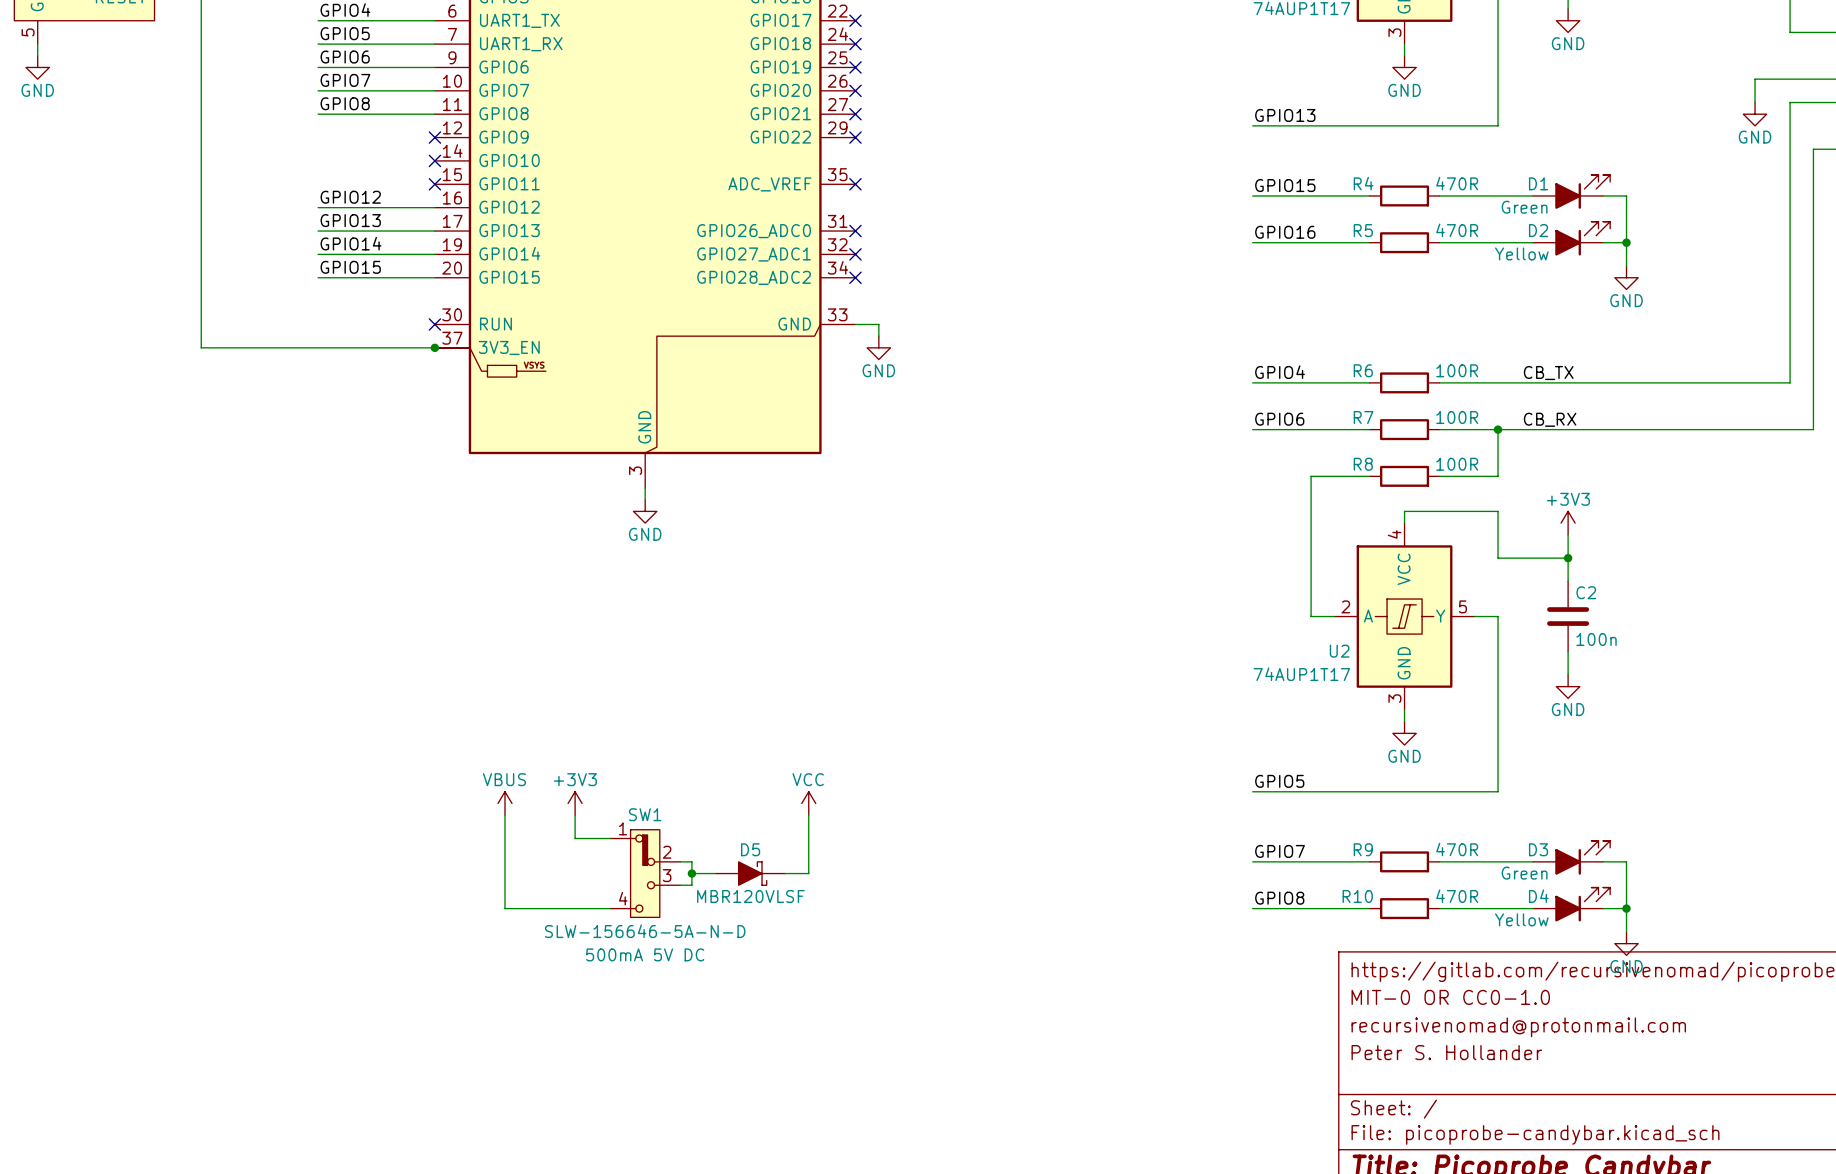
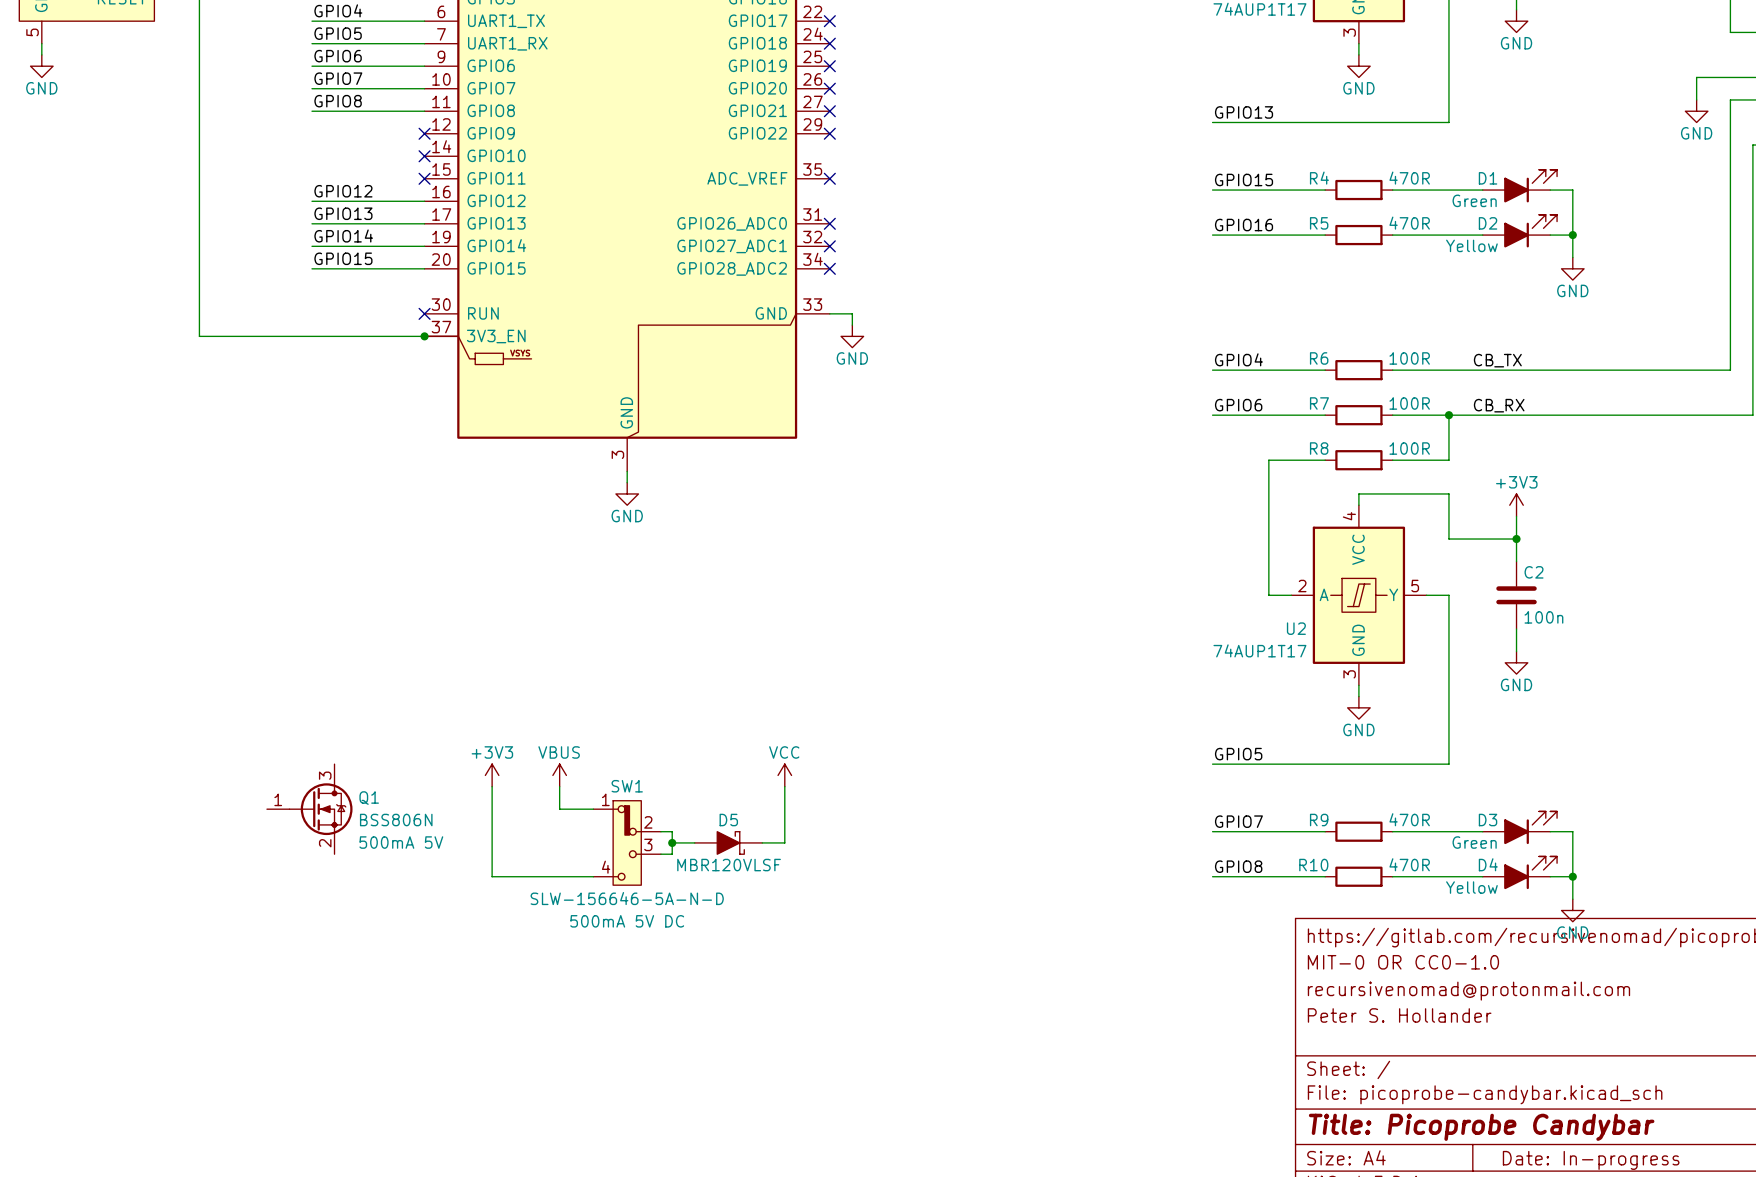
power symbol: VBUS (505, 803) -> +3V3 (492, 775)
power symbol: +3V3 (575, 803) -> VBUS (559, 775)
Q1: none -> BSS806N (309, 809)

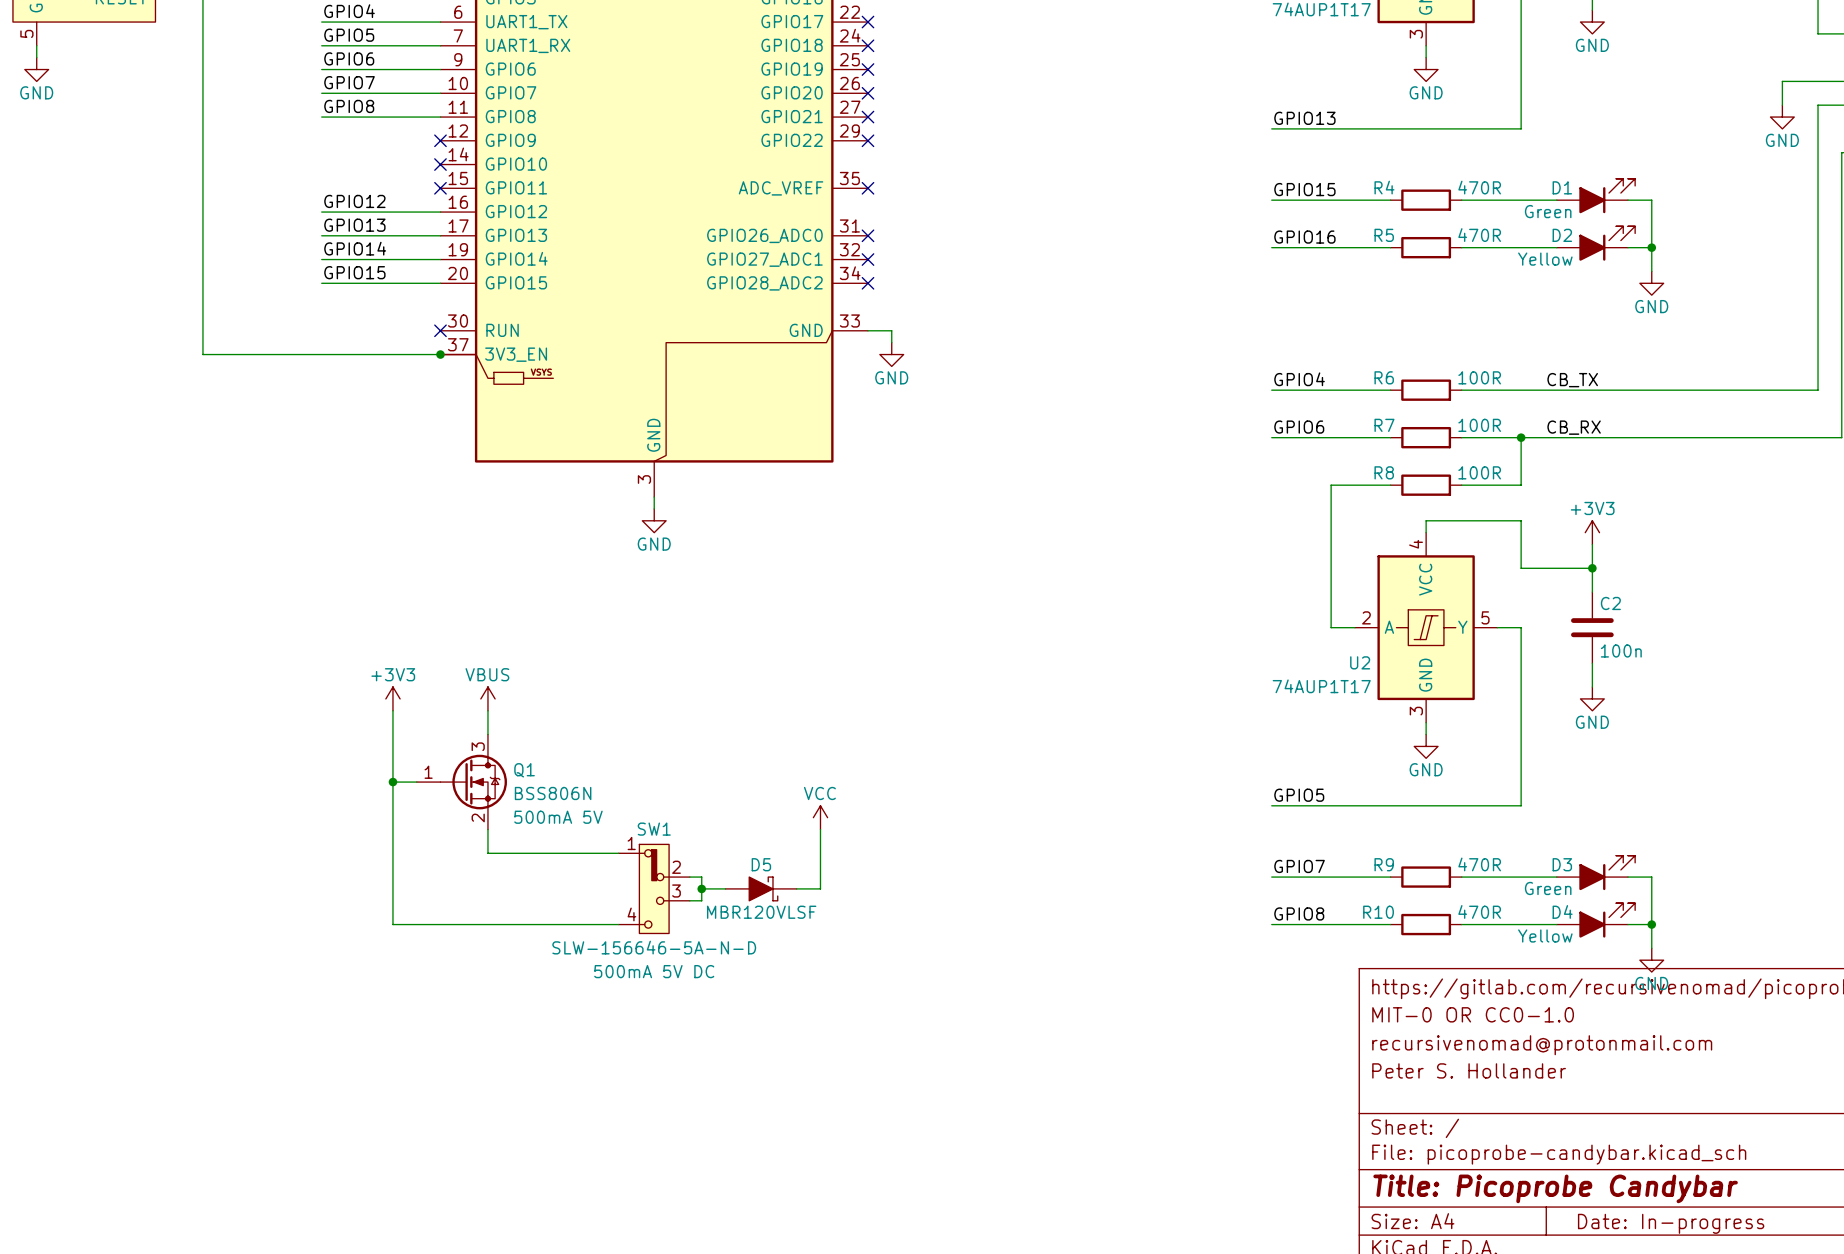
wire: none -> (487, 710) (487, 734)
wire: none -> (392, 782) (416, 782)
junction: none -> (392, 782)
power symbol position: +3V3 (492, 775) -> +3V3 (392, 698)
power symbol position: VBUS (559, 775) -> VBUS (487, 698)
wire: (492, 786) (492, 876) -> (392, 710) (392, 924) (511, 924)
wire: (559, 786) (559, 809) -> (487, 829) (487, 853) (582, 853)
Q1 position: (309, 809) -> (461, 782)

